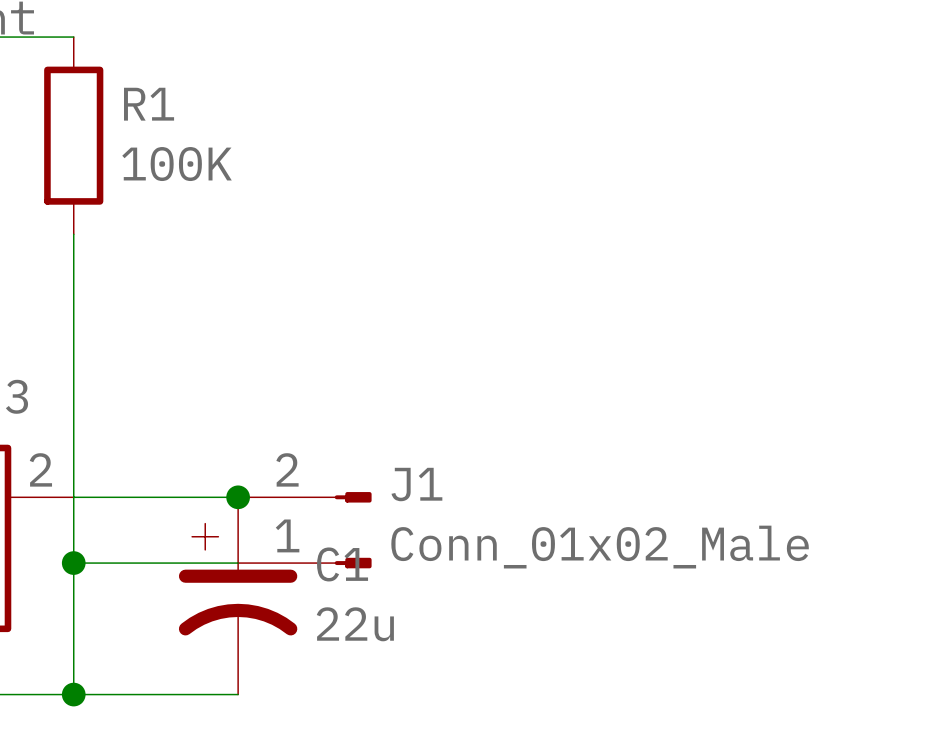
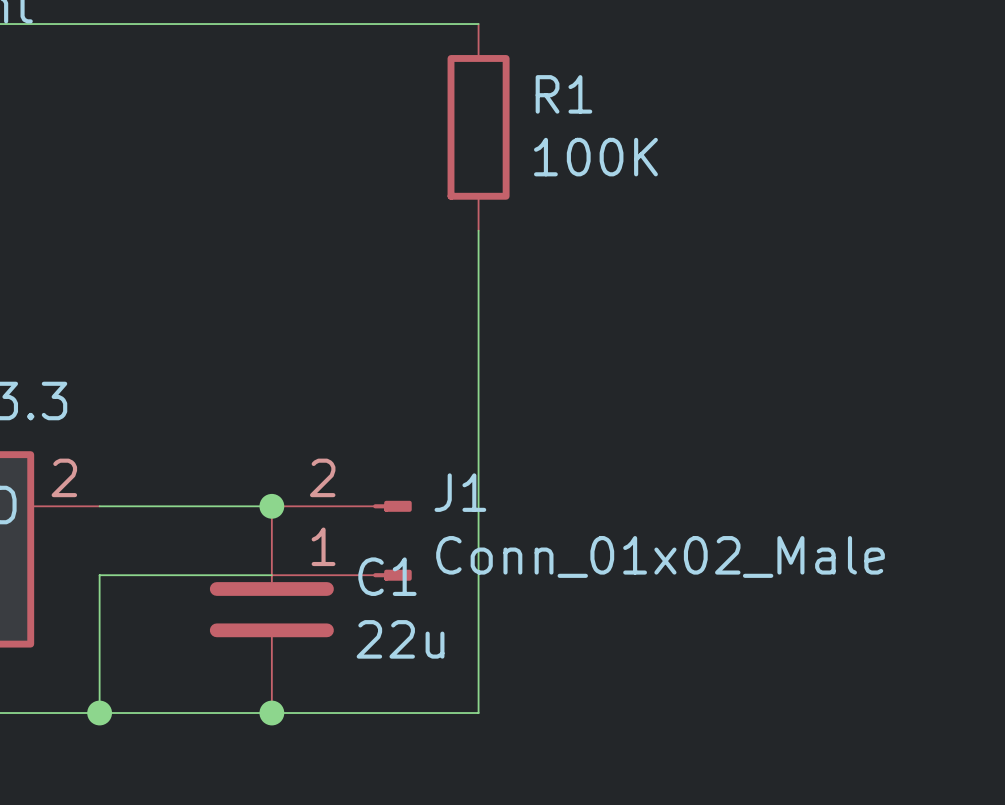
wire: none -> (99, 24) (478, 24)
R1 position: (73, 135) -> (478, 127)
wire: (73, 234) (73, 563) -> none
wire: none -> (478, 230) (478, 713) (271, 713)
C1 symbol: [178, 497, 298, 695] -> [209, 506, 334, 714]
junction: (73, 563) -> none
junction: none -> (271, 713)

